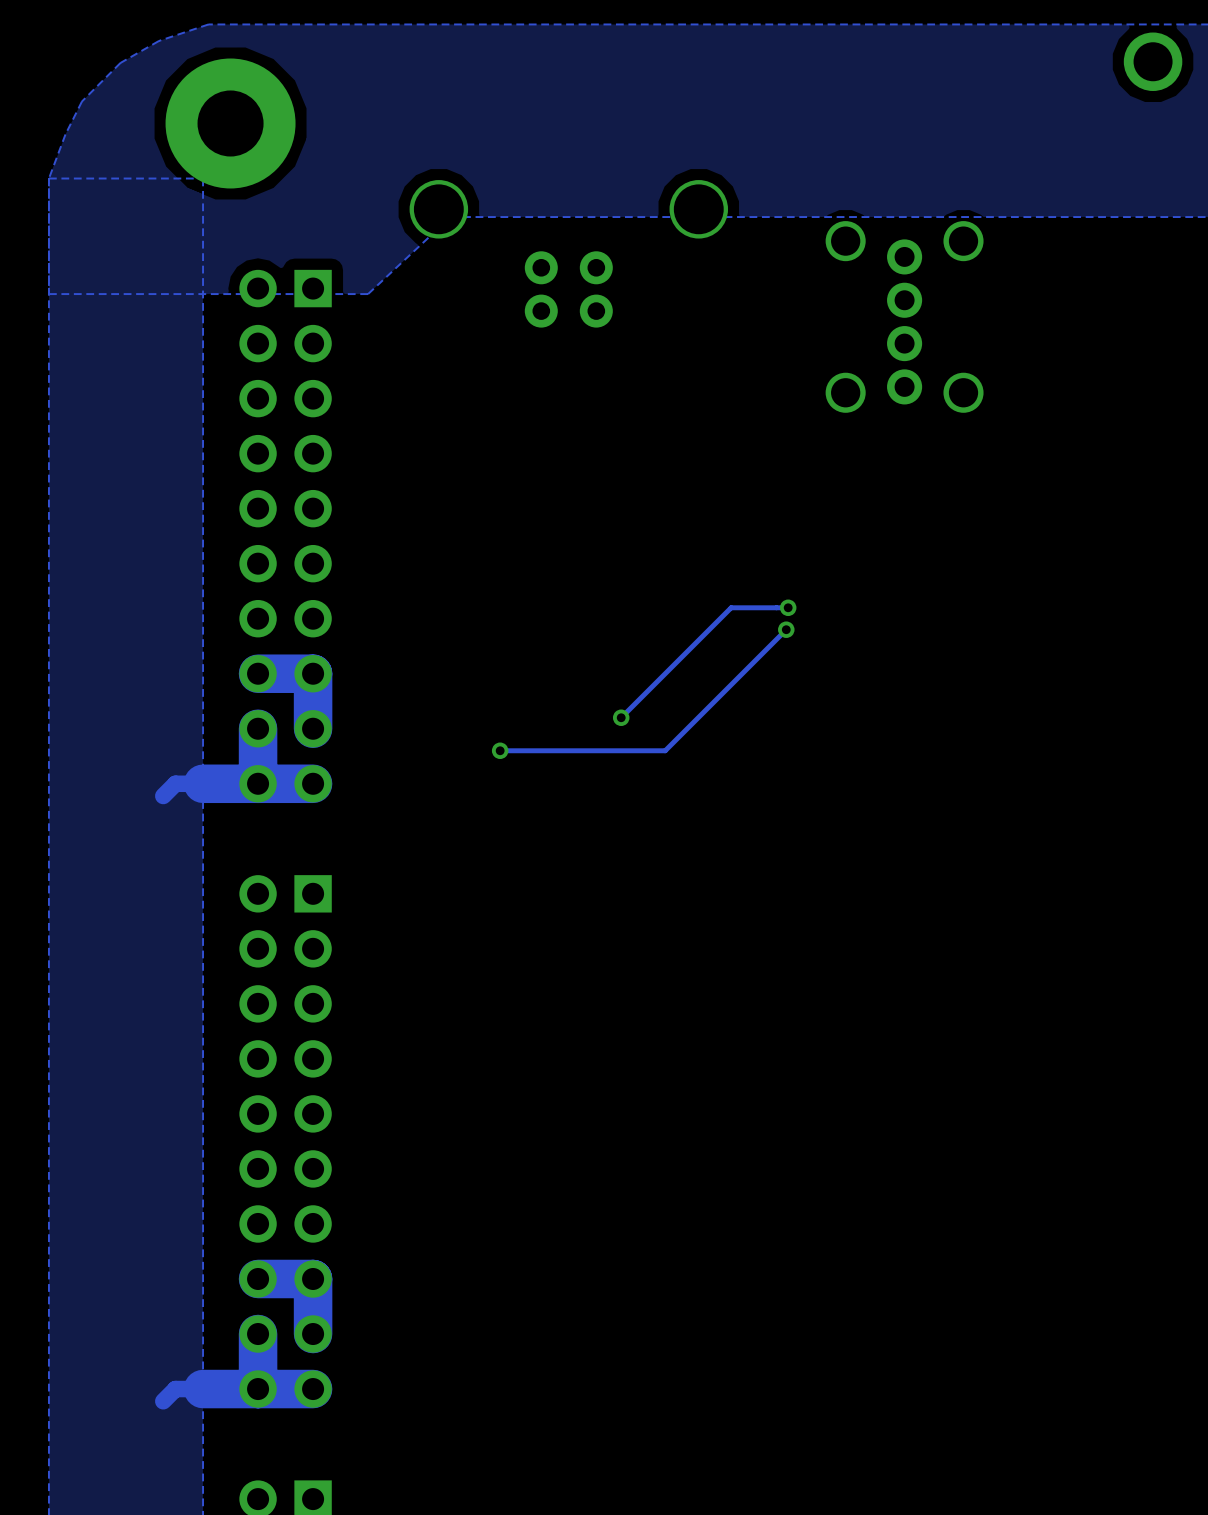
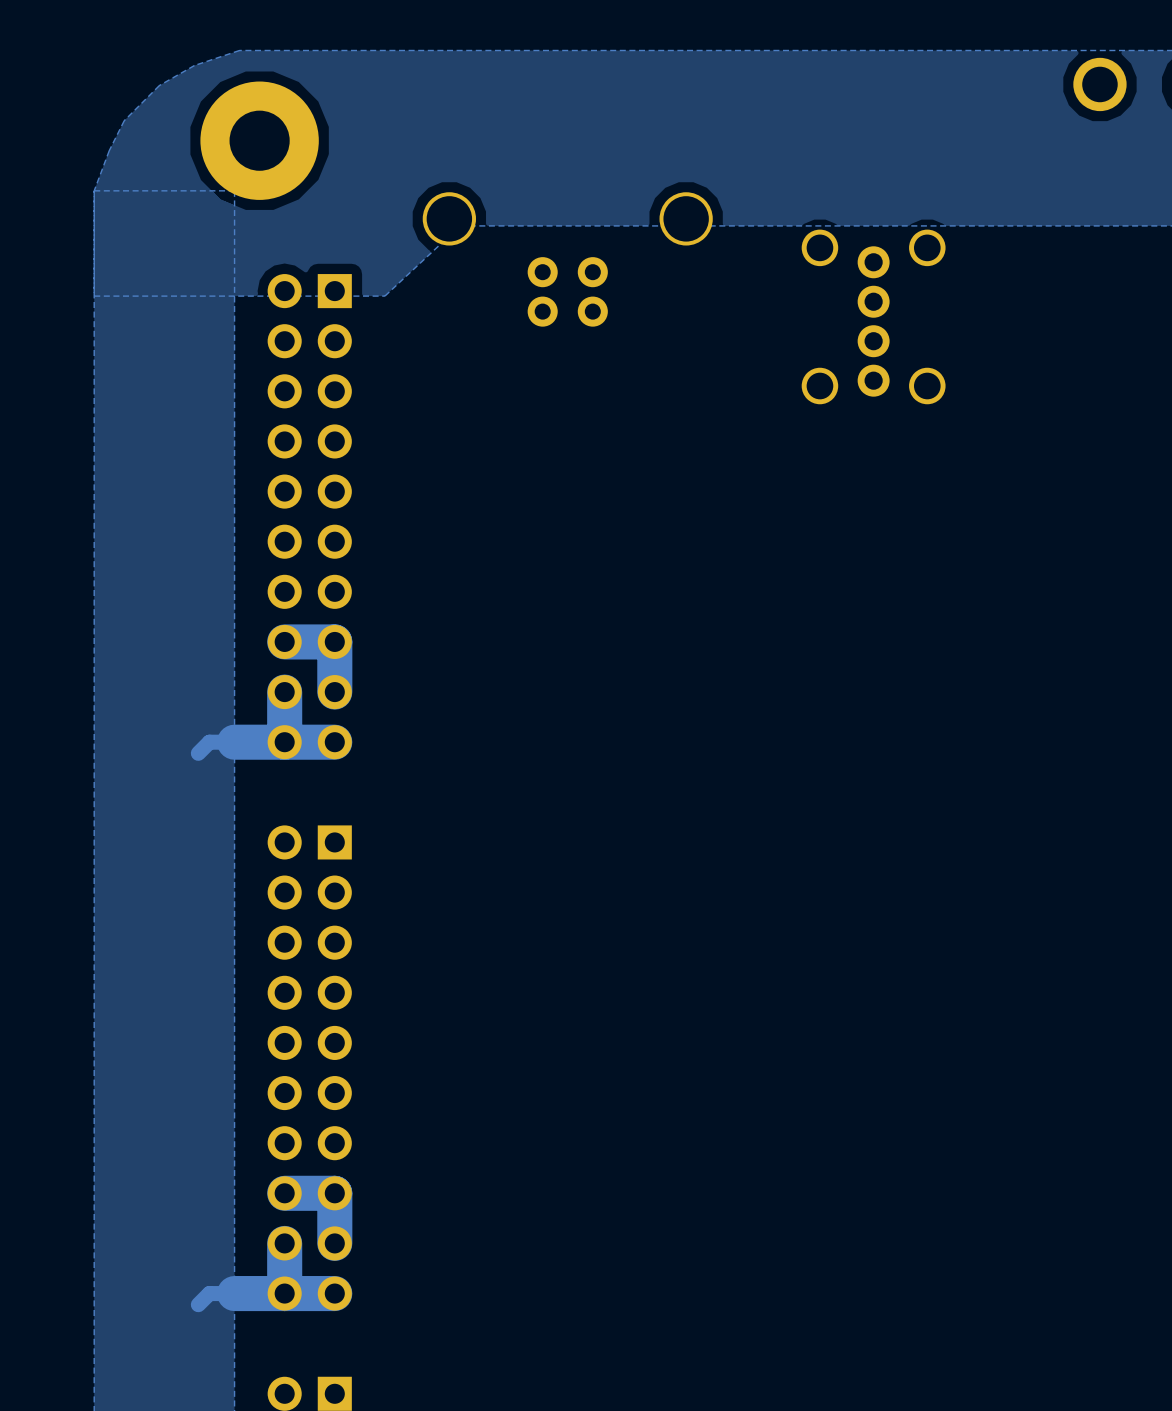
track: (788, 607) (731, 607) (621, 717) -> none
via: (788, 607) -> none
track: (786, 629) (665, 750) (500, 750) -> none
via: (786, 629) -> none
via: (621, 717) -> none
via: (500, 750) -> none

